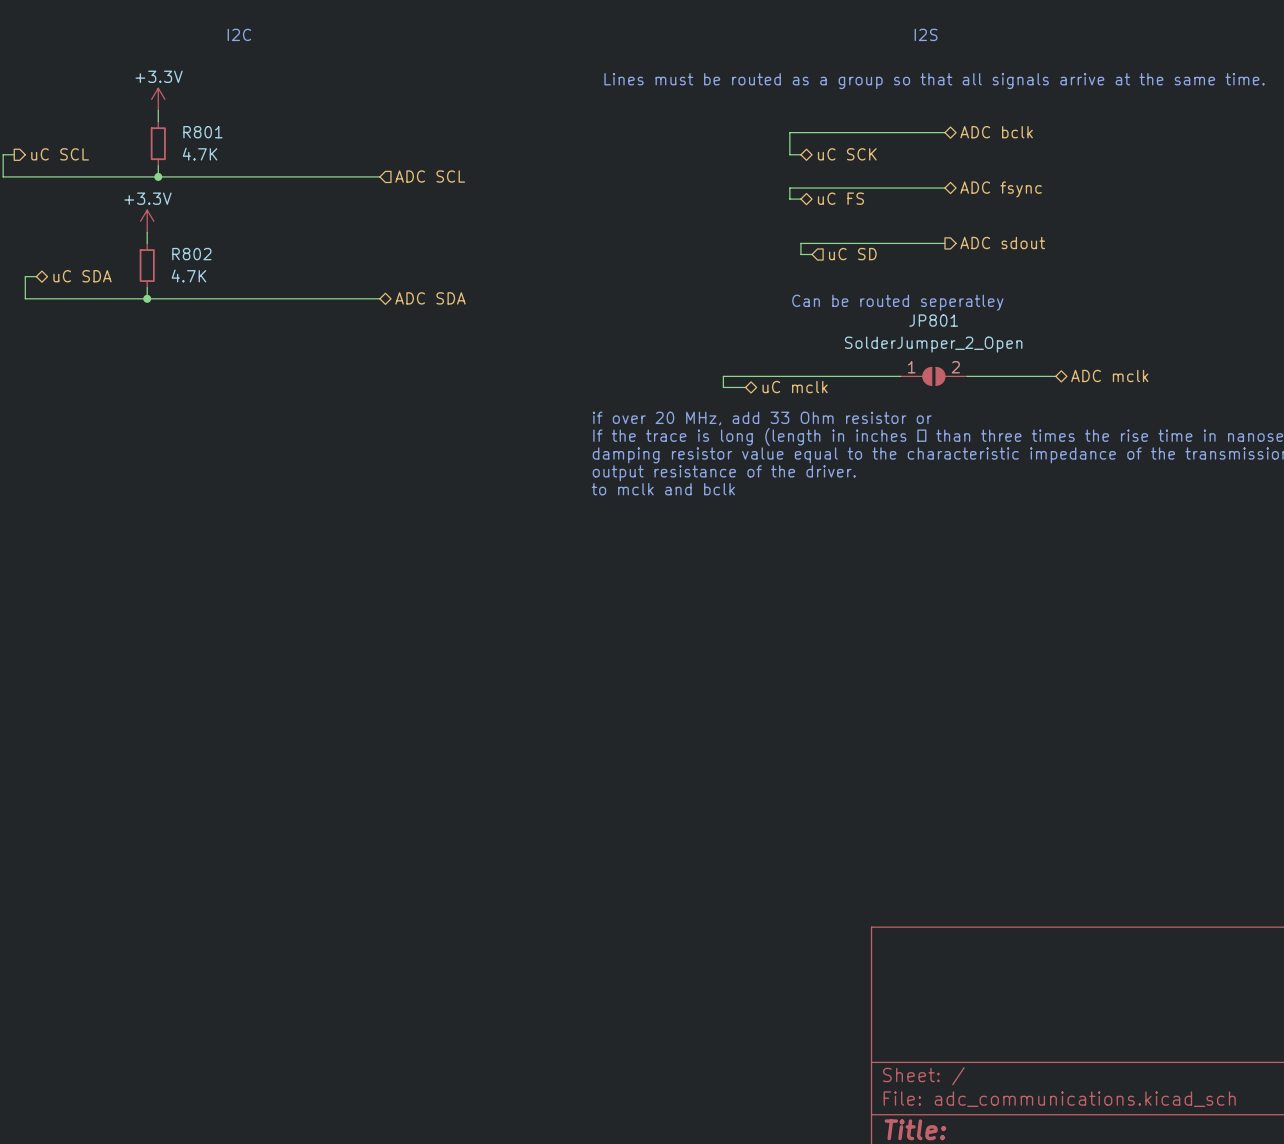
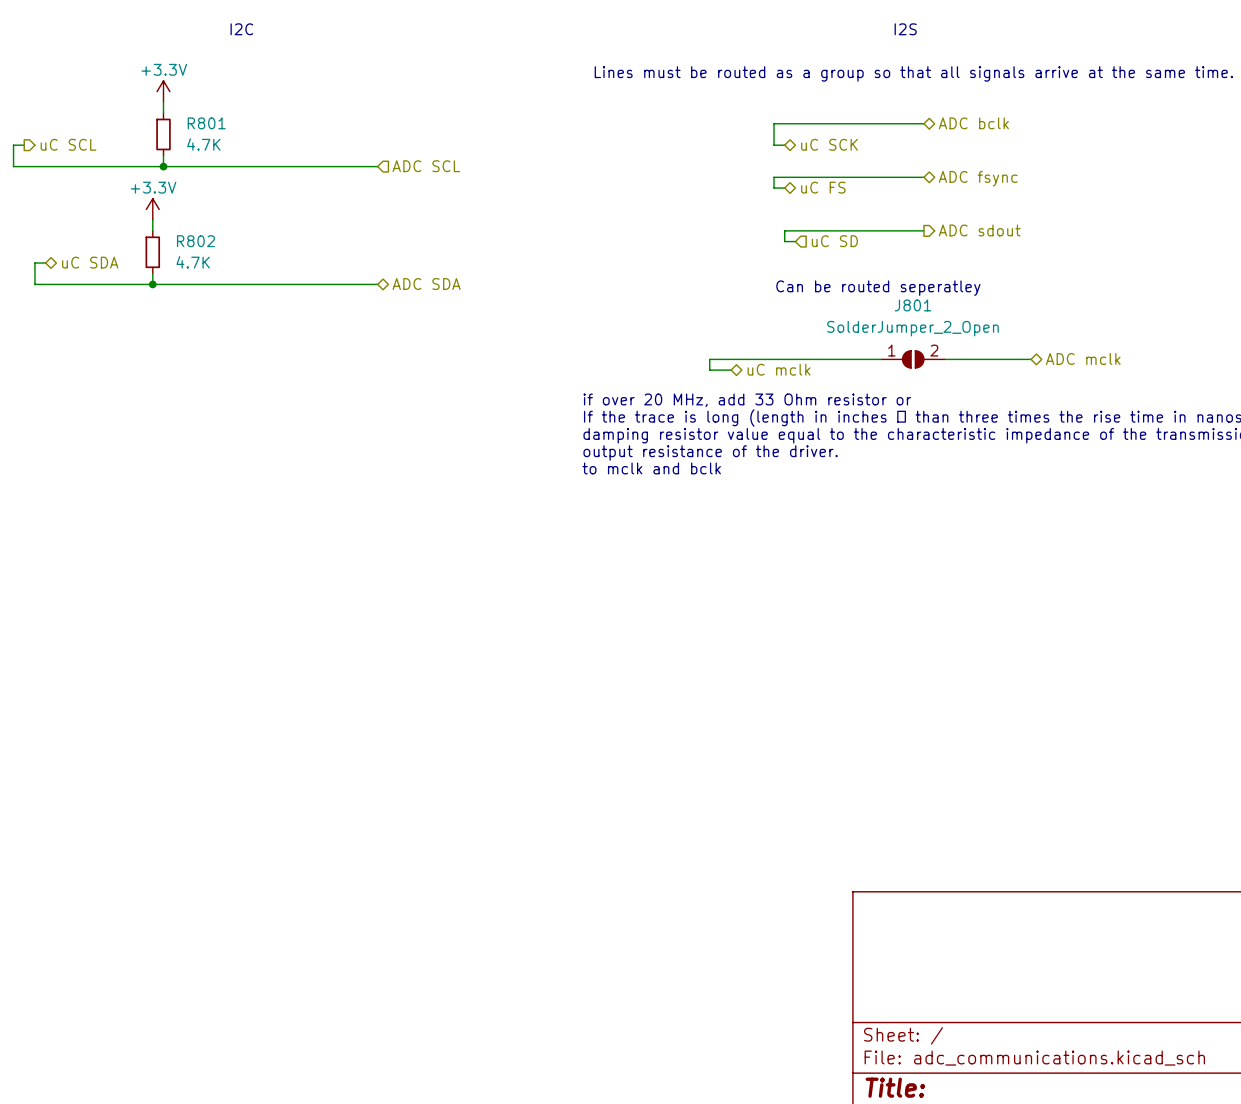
JP801 name: JP801 (933, 320) -> J801 (912, 305)

